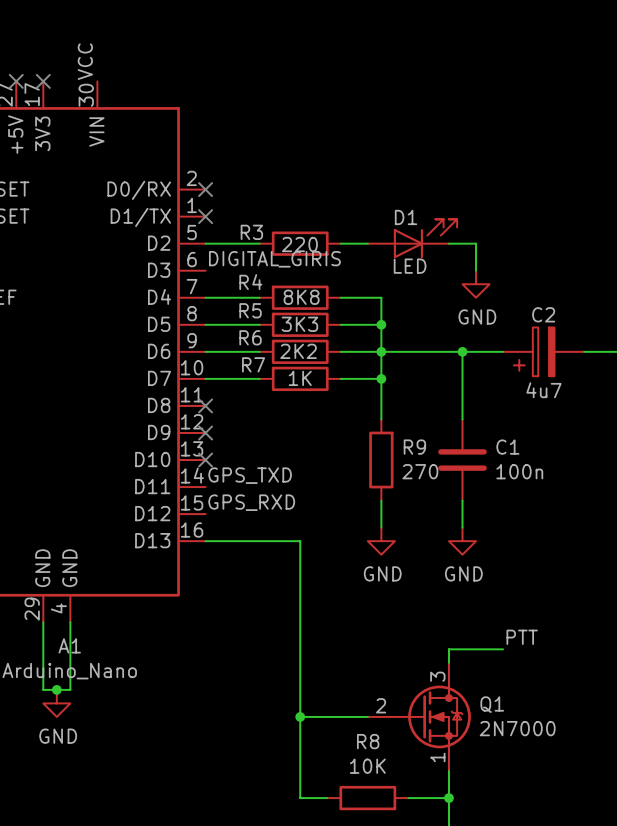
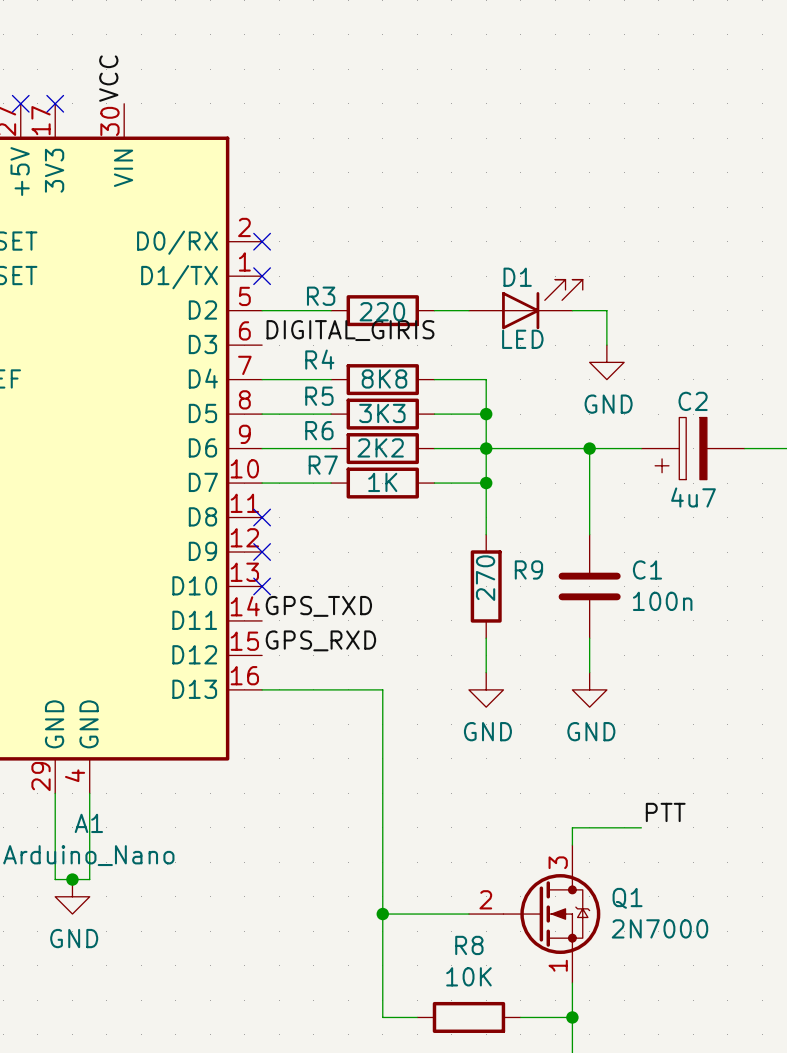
R9 value rotation: 0° (420, 471) -> 90° counterclockwise (485, 578)
R9 value position: 270 (420, 471) -> 270 (485, 578)

